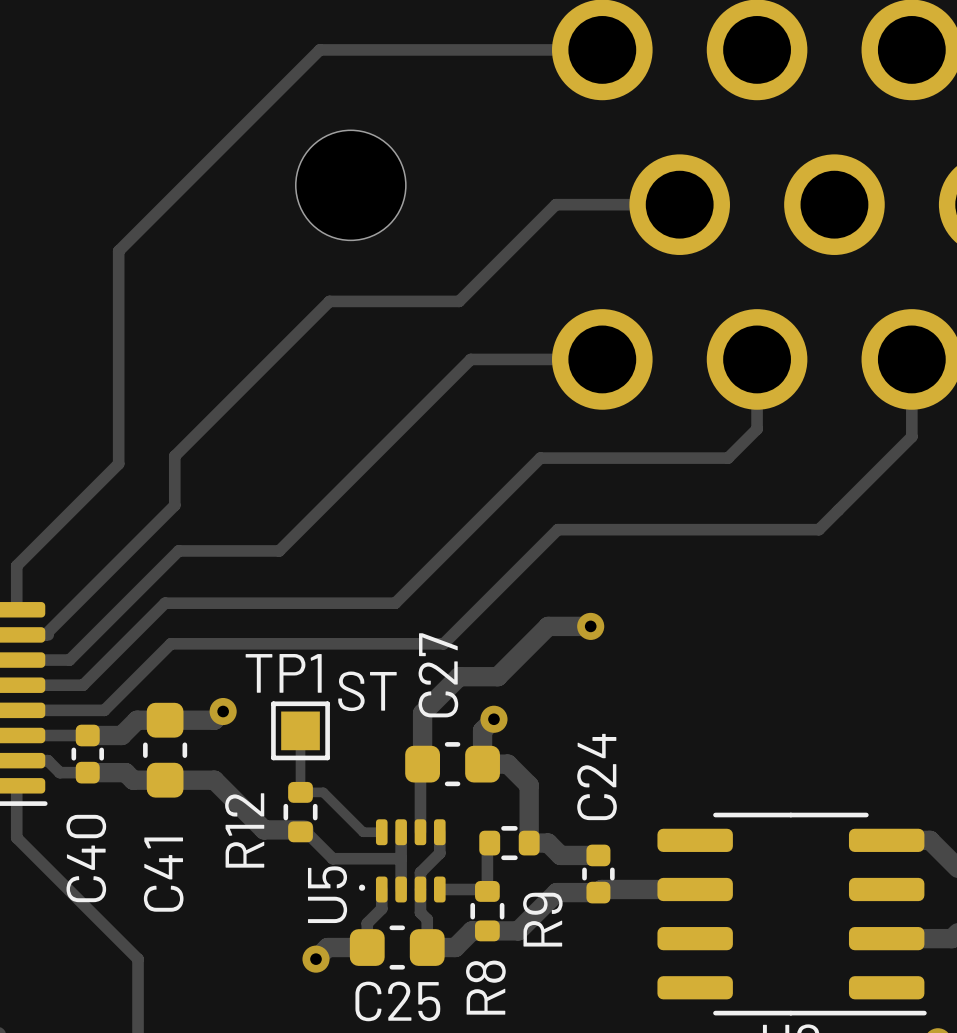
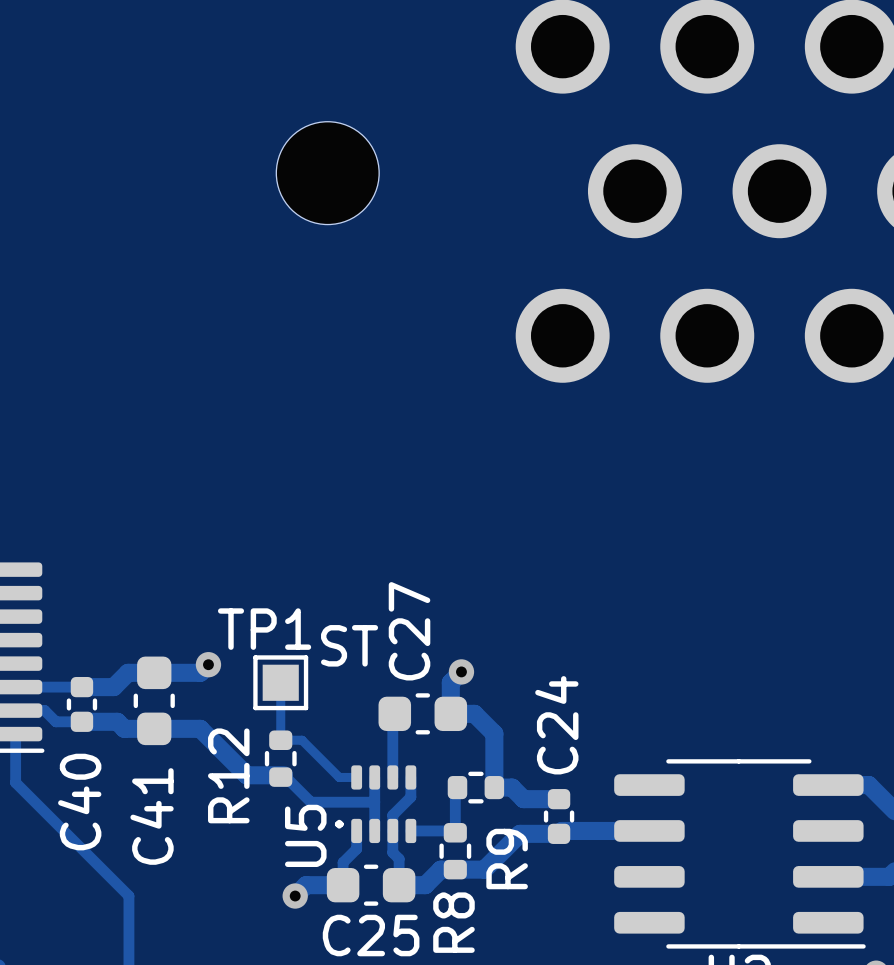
track: (602, 49) (319, 49) (118, 251) (118, 463) (16, 565) (16, 609) -> none
track: (679, 204) (555, 204) (459, 301) (329, 301) (174, 456) (174, 505) (45, 634) -> none
track: (602, 359) (470, 359) (279, 550) (178, 550) (69, 660) (16, 660) -> none
track: (757, 359) (757, 429) (728, 458) (540, 458) (395, 603) (165, 603) (83, 685) (16, 685) -> none
track: (911, 359) (911, 436) (818, 529) (557, 529) (443, 643) (170, 643) (104, 710) (16, 710) -> none
track: (590, 626) (548, 626) (497, 676) (459, 676) (422, 713) (422, 764) -> none
via: (590, 626) -> none

